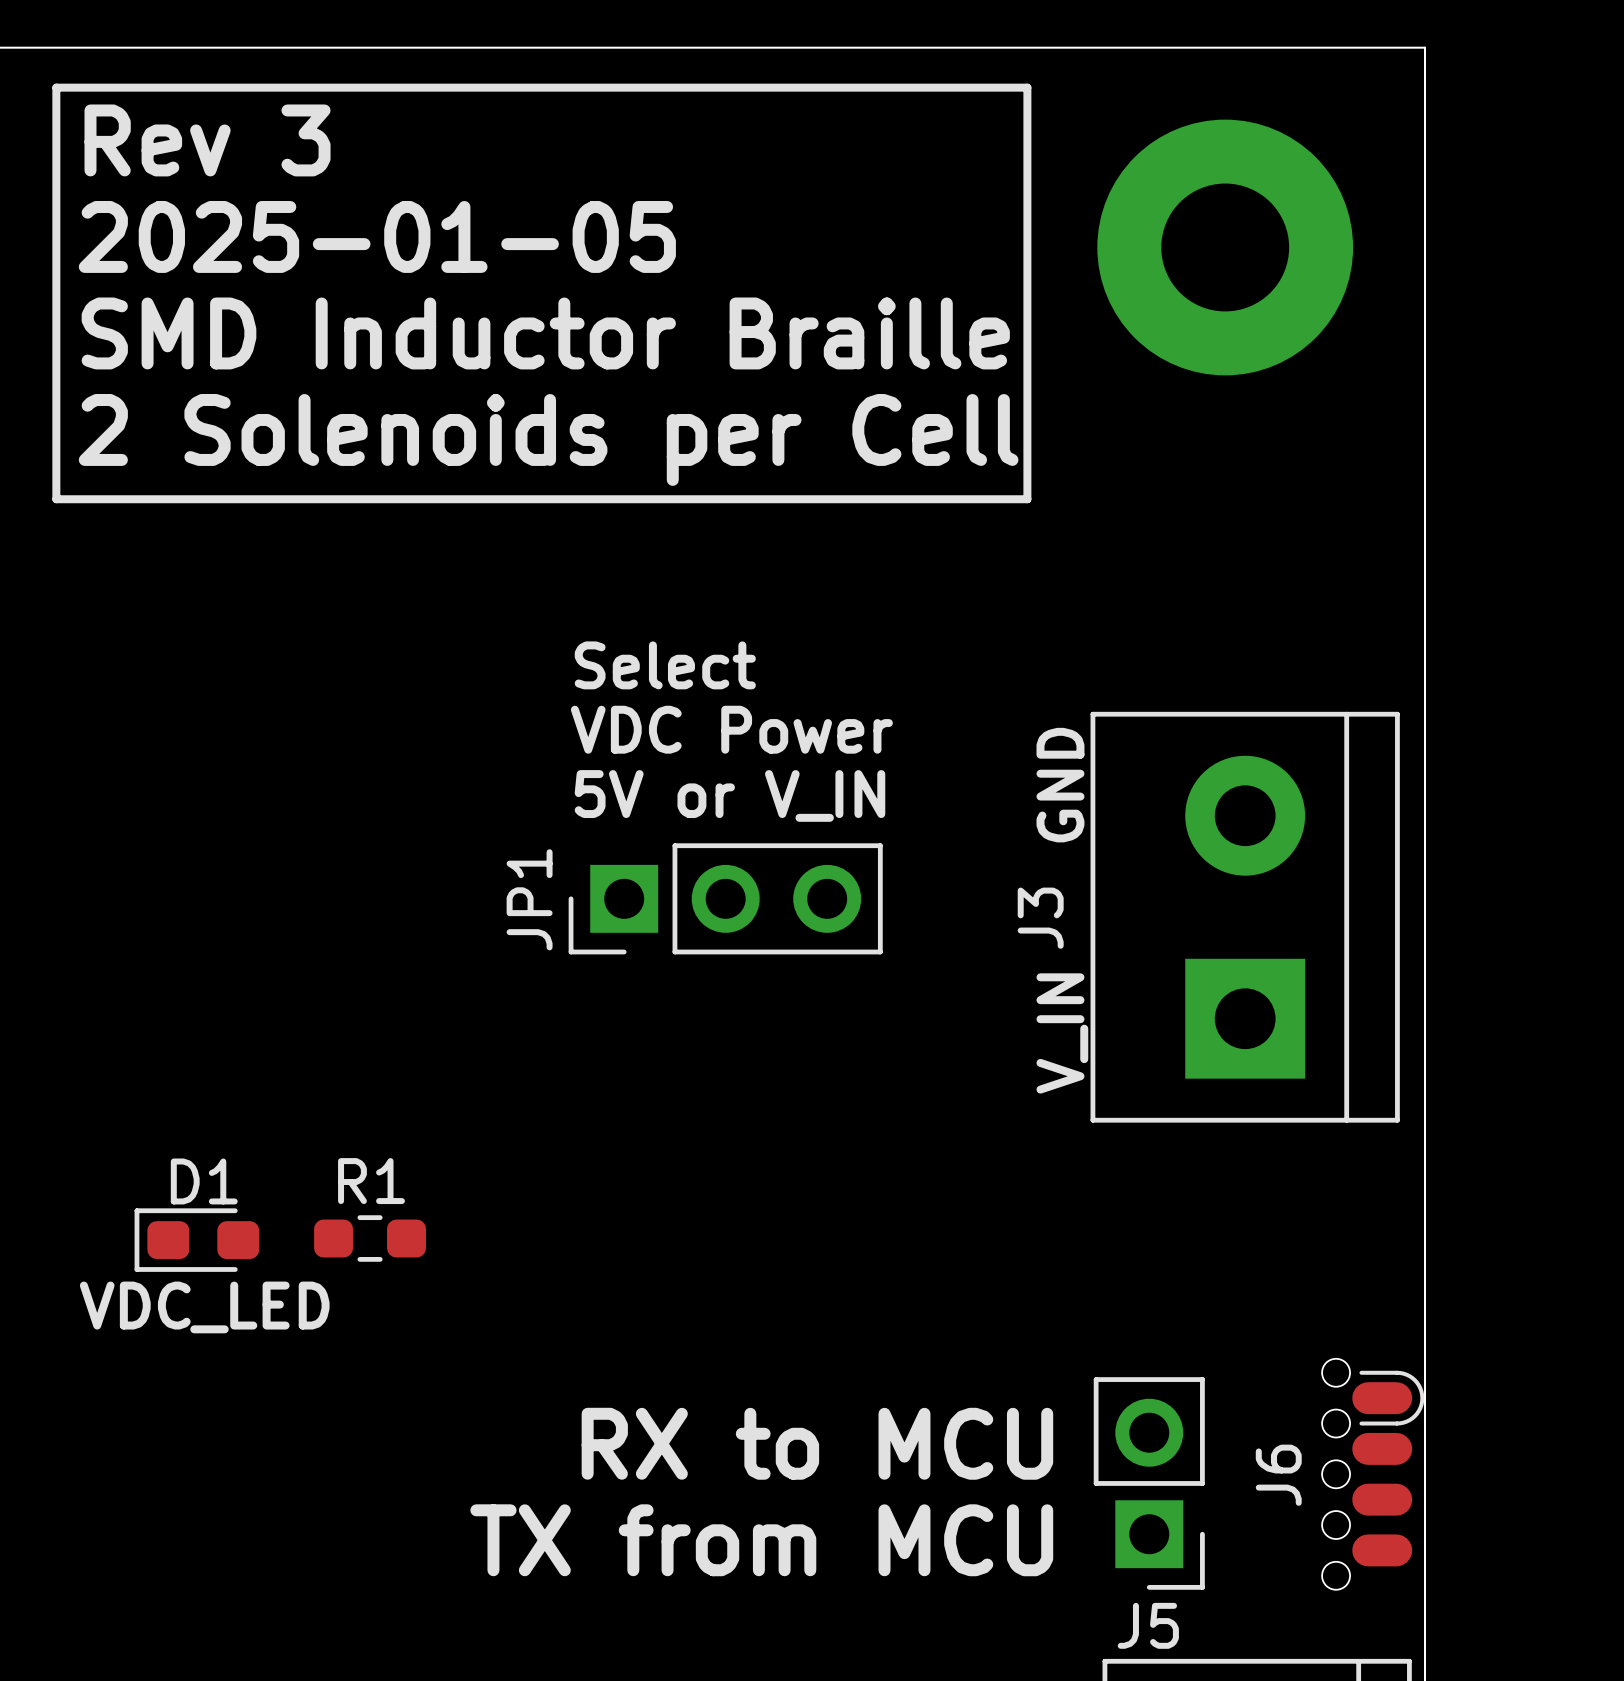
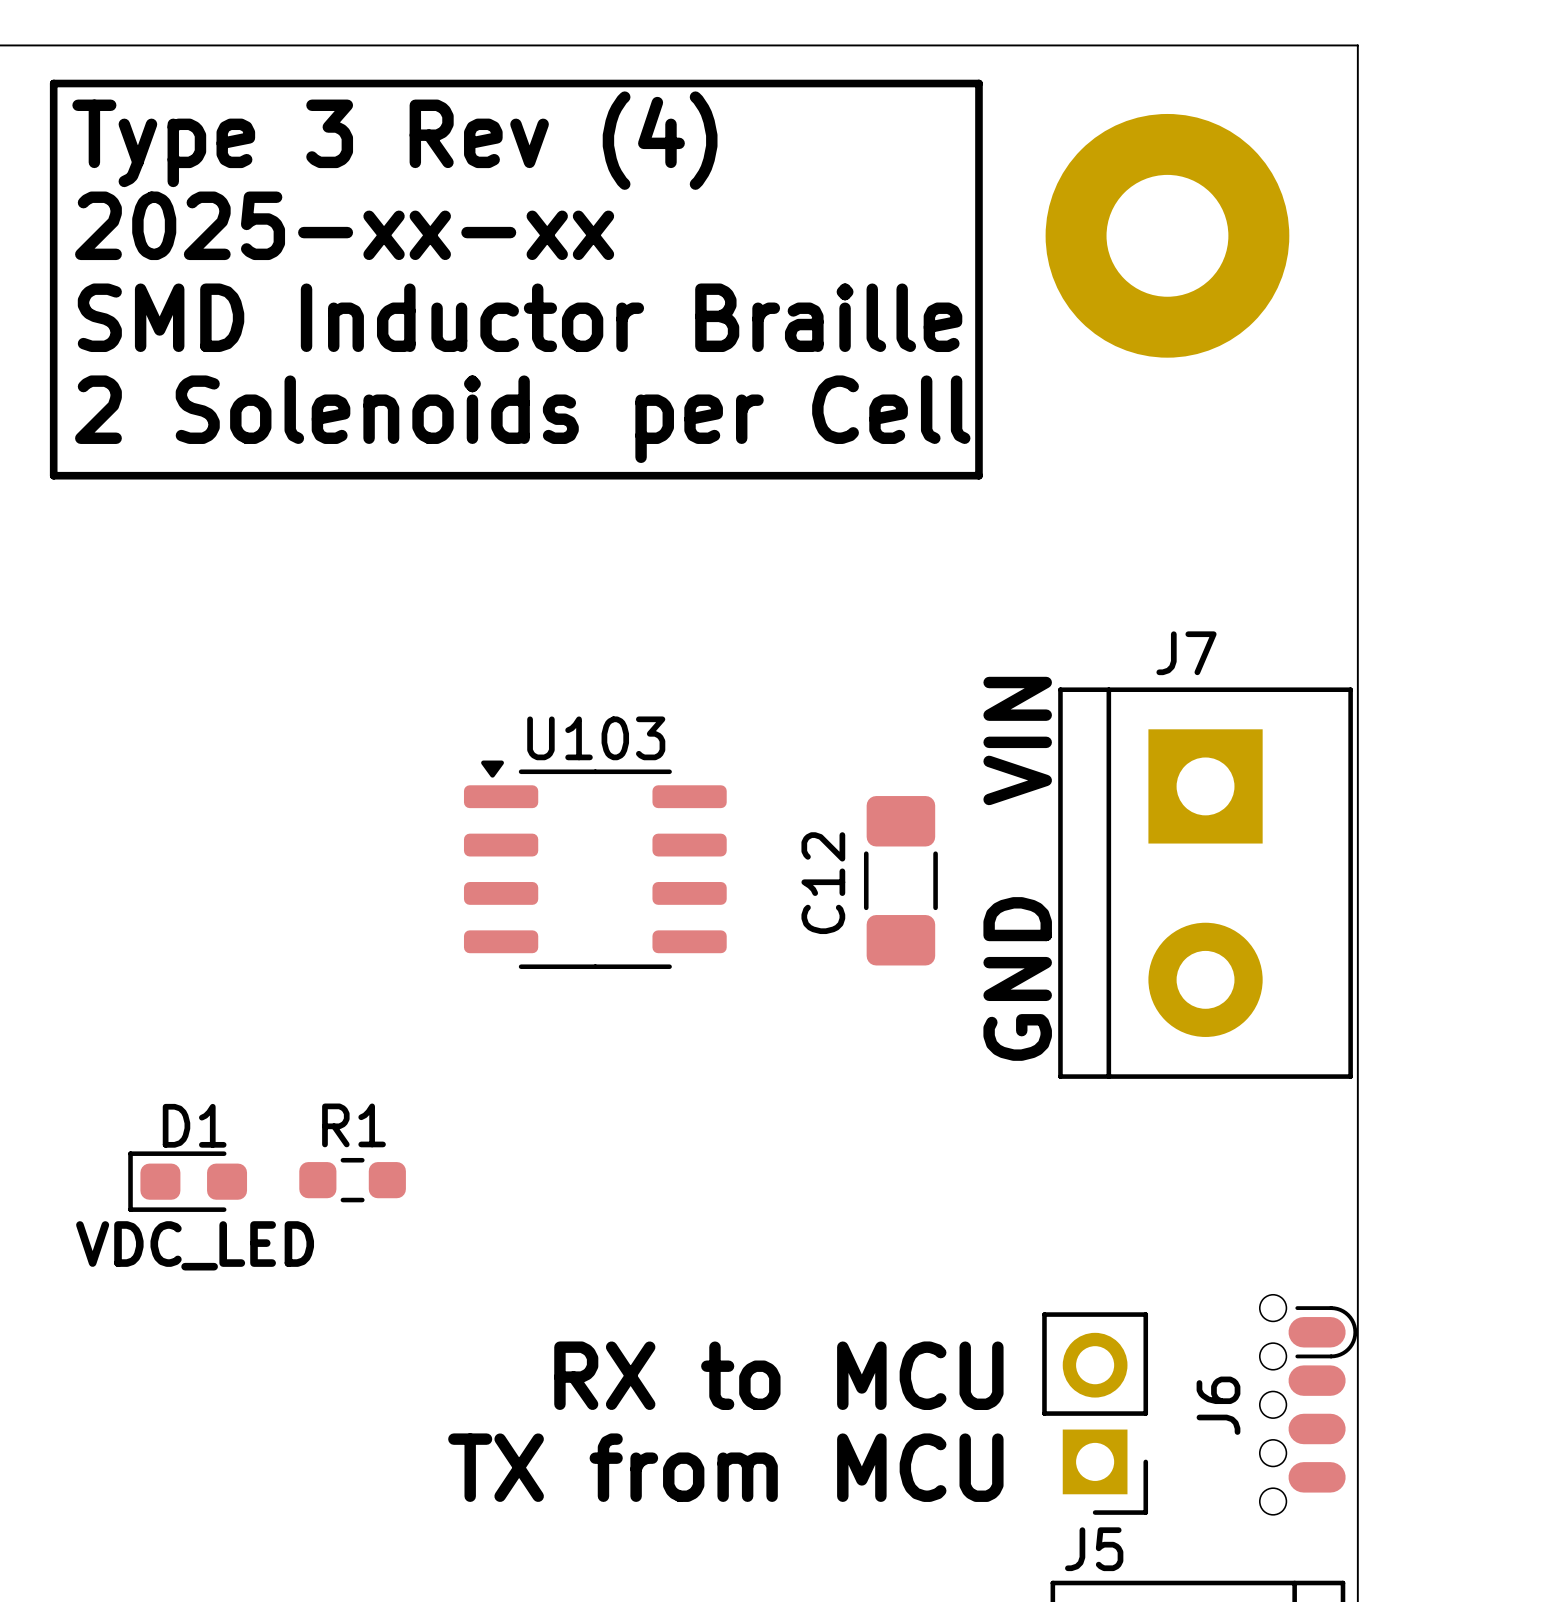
text: Rev 3 (207, 140) -> Type 3 Rev (4) (394, 140)
text: 2025-01-05 (377, 236) -> 2025-xx-xx (344, 225)
text: Select (665, 665) -> none
text: VDC Power (731, 729) -> none
text: 5V or V_IN (730, 795) -> none
JP1: (725, 898) -> none
U103: none -> (595, 864)
text: V_IN GND (1062, 910) -> GND VIN (1017, 868)
J3: (1245, 917) -> none
C12: none -> (900, 880)
J7: none -> (1205, 883)

